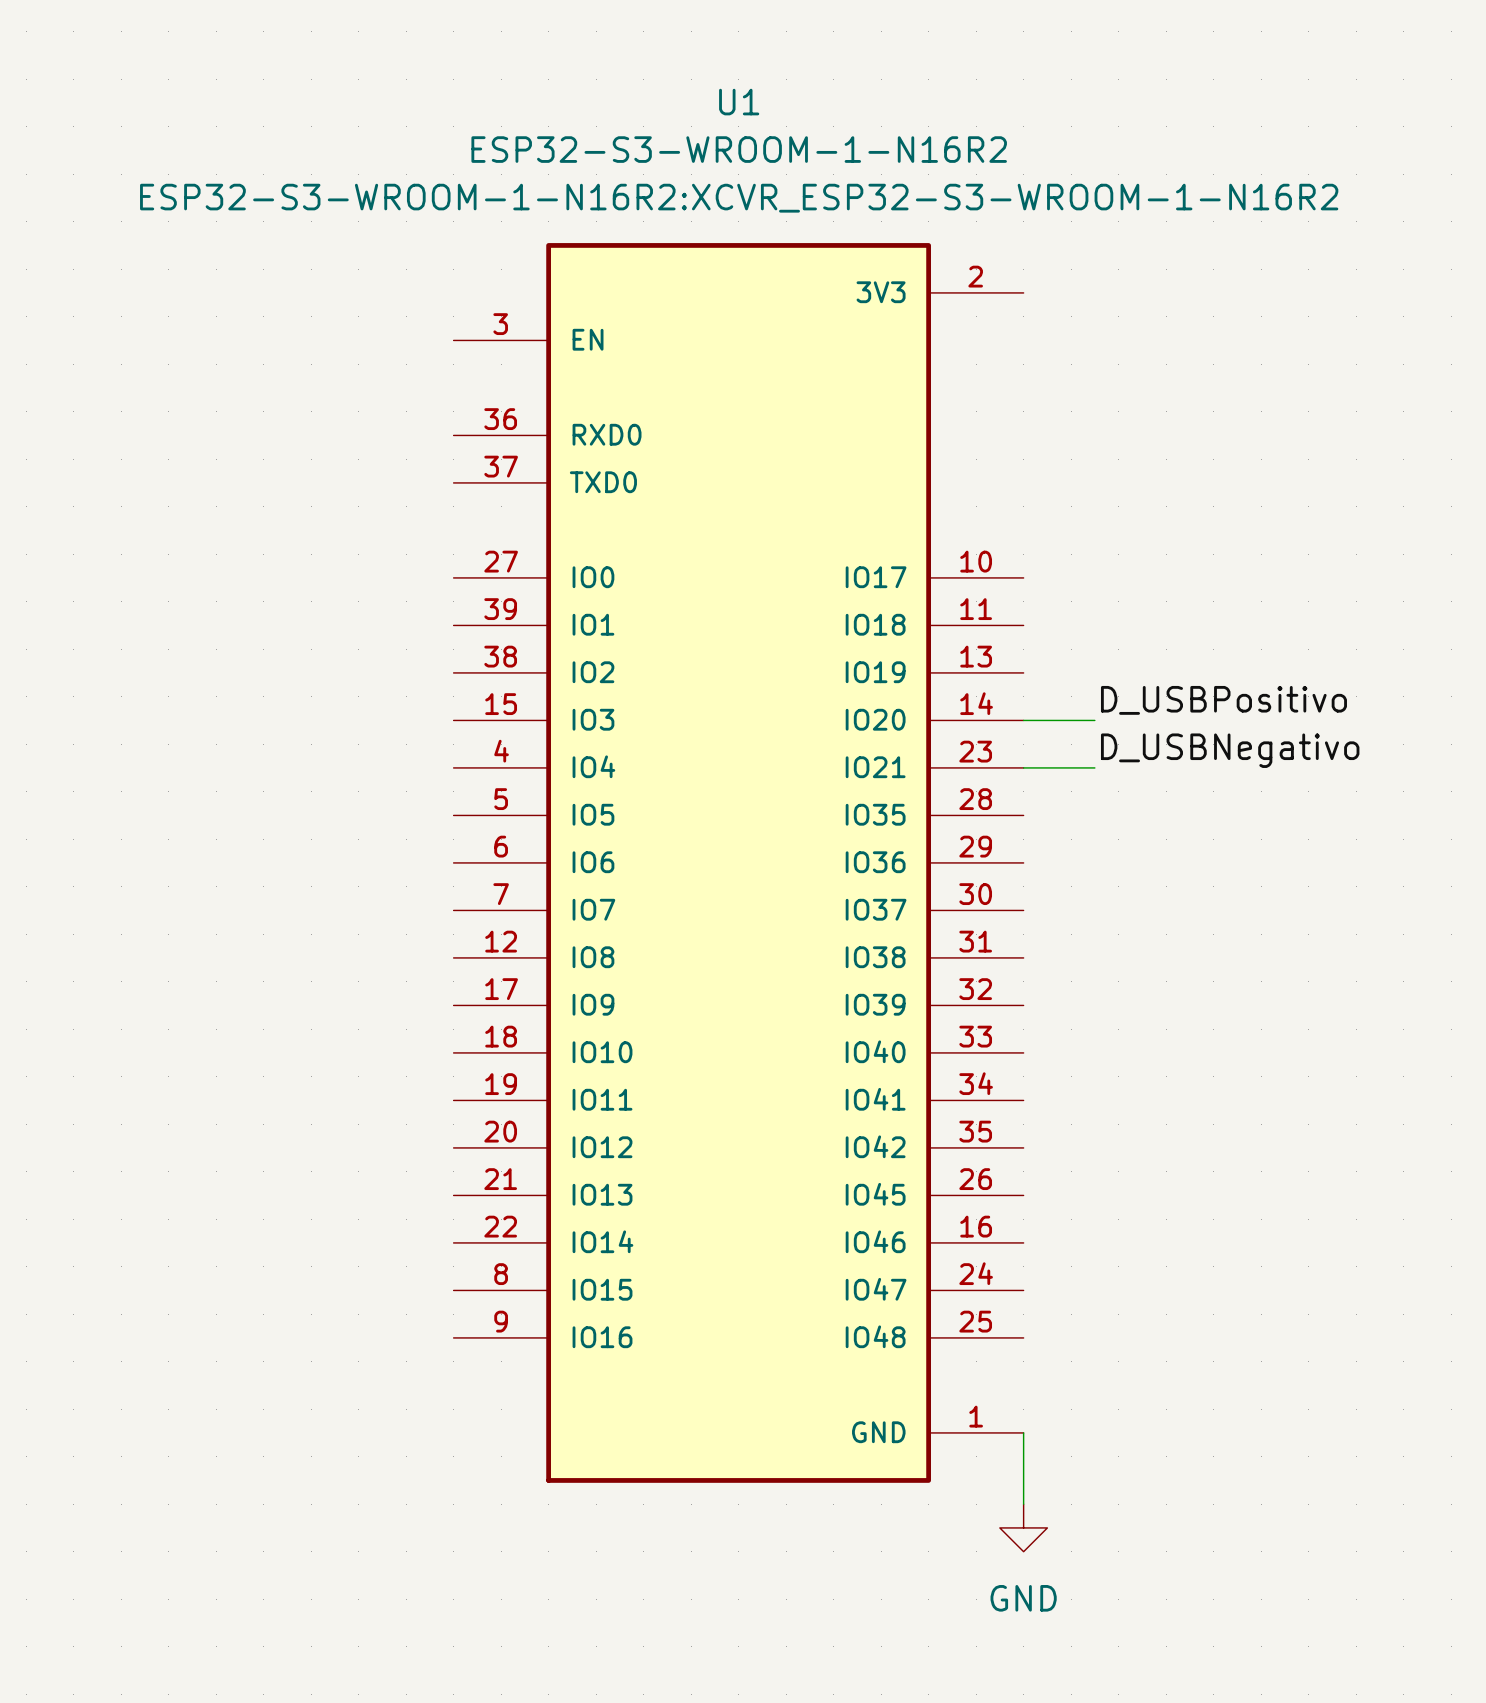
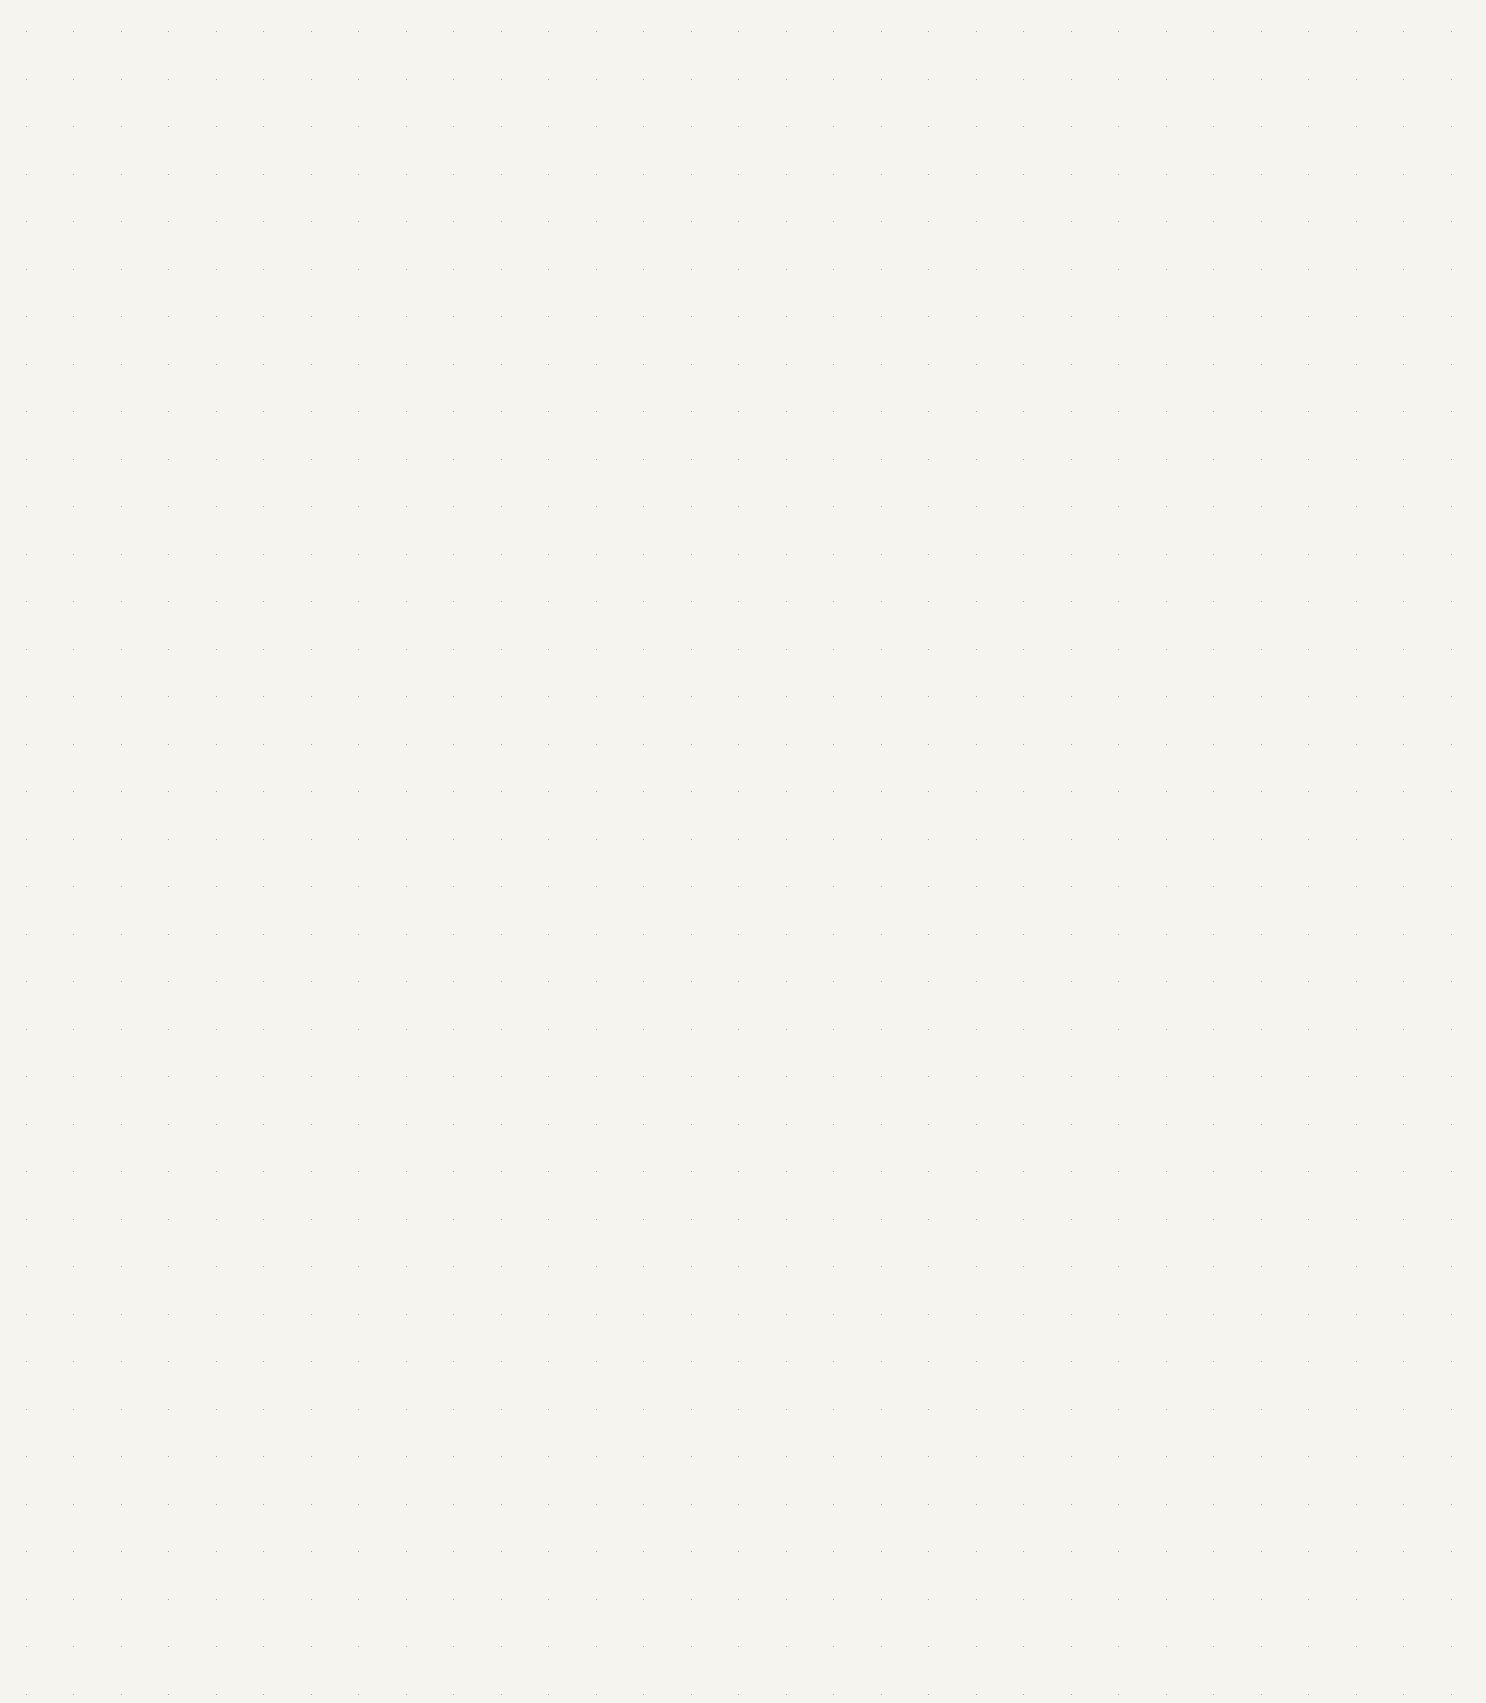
label: D_USBPositivo (1223, 700) -> none
wire: (1023, 720) (1094, 720) -> none
label: D_USBNegativo (1230, 750) -> none
wire: (1023, 767) (1094, 767) -> none
U1: ESP32-S3-WROOM-1-N16R2 (738, 862) -> none
wire: (1023, 1432) (1023, 1504) -> none
power symbol: GND (1023, 1527) -> none

